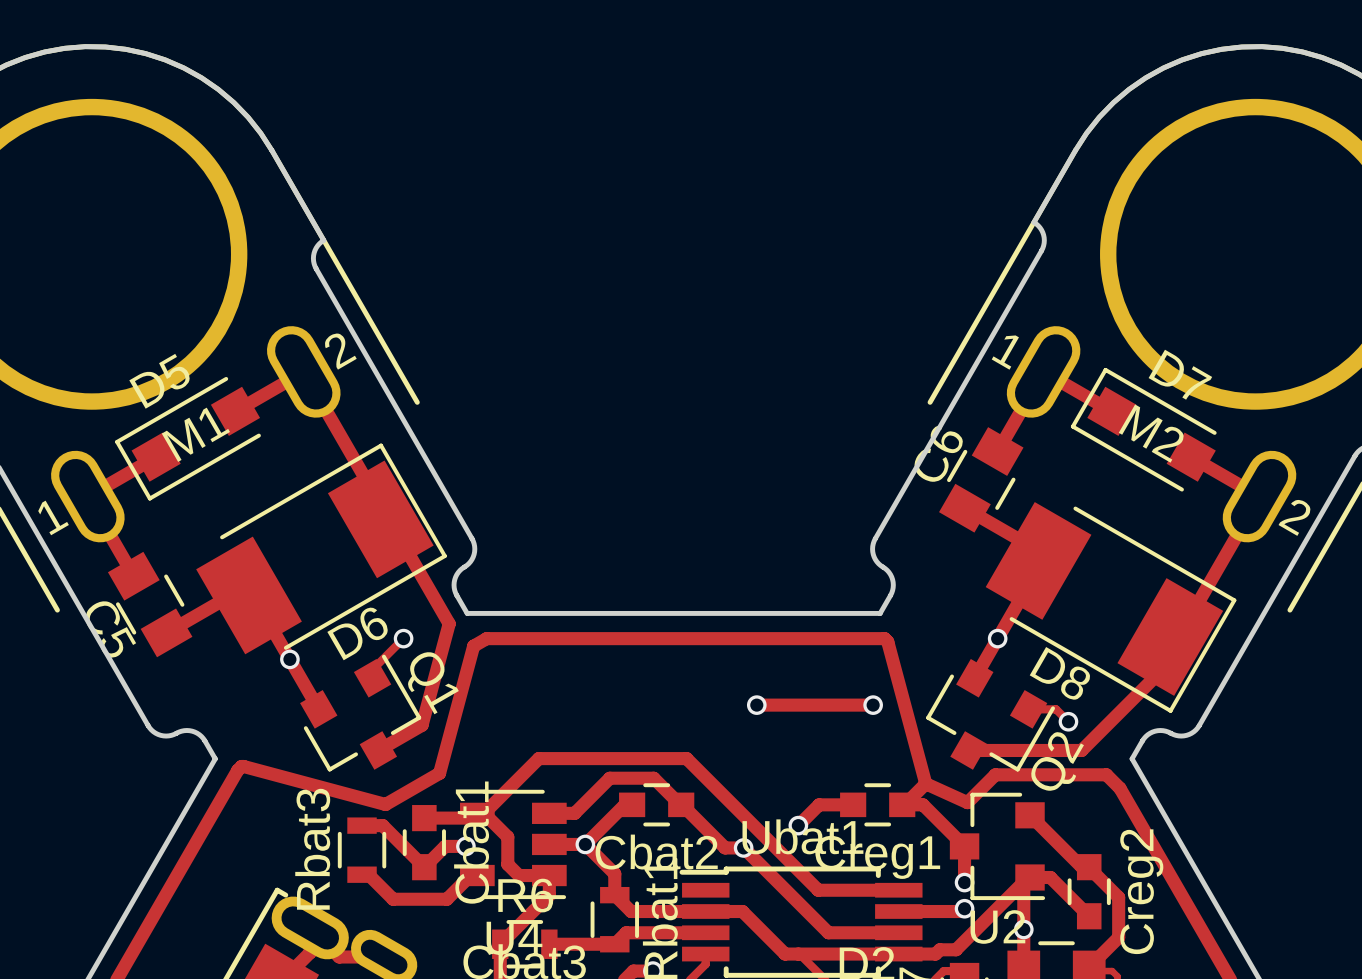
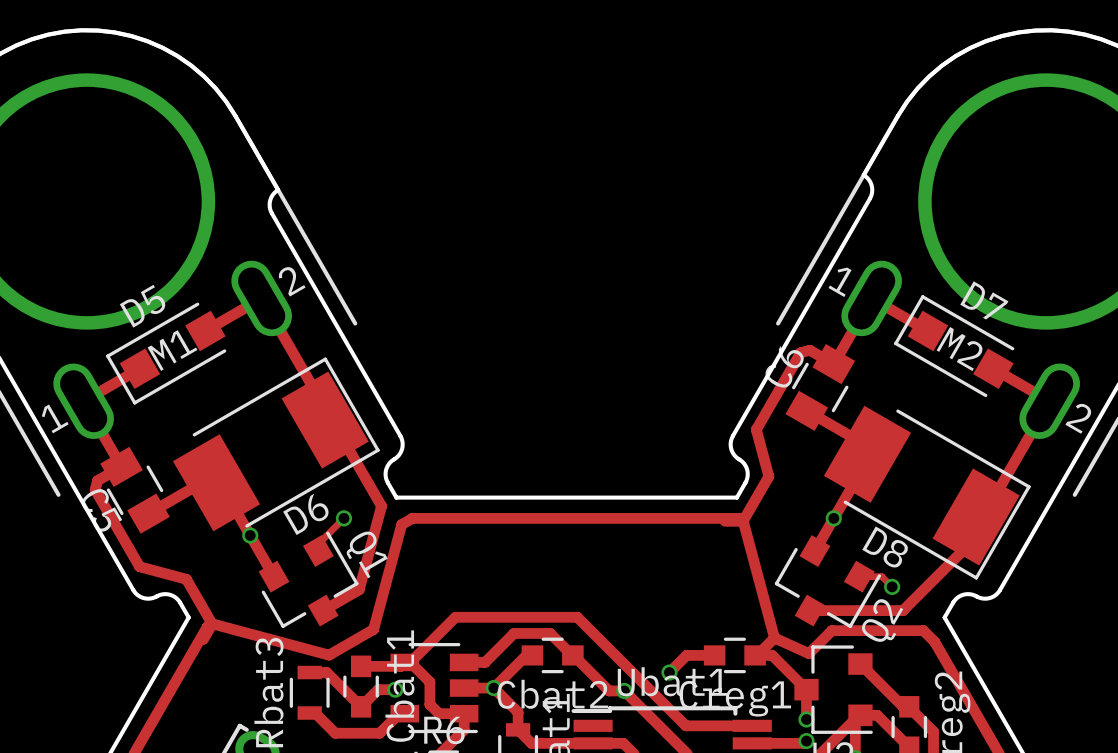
track: none -> (833, 364) (809, 350) (800, 352) (756, 429) (768, 476) (743, 521) (725, 521)
track: none -> (121, 466) (97, 480) (95, 489) (139, 566) (186, 579) (212, 624) (203, 639)
track: (756, 705) (873, 705) -> none
via: (756, 705) -> none
via: (873, 705) -> none

